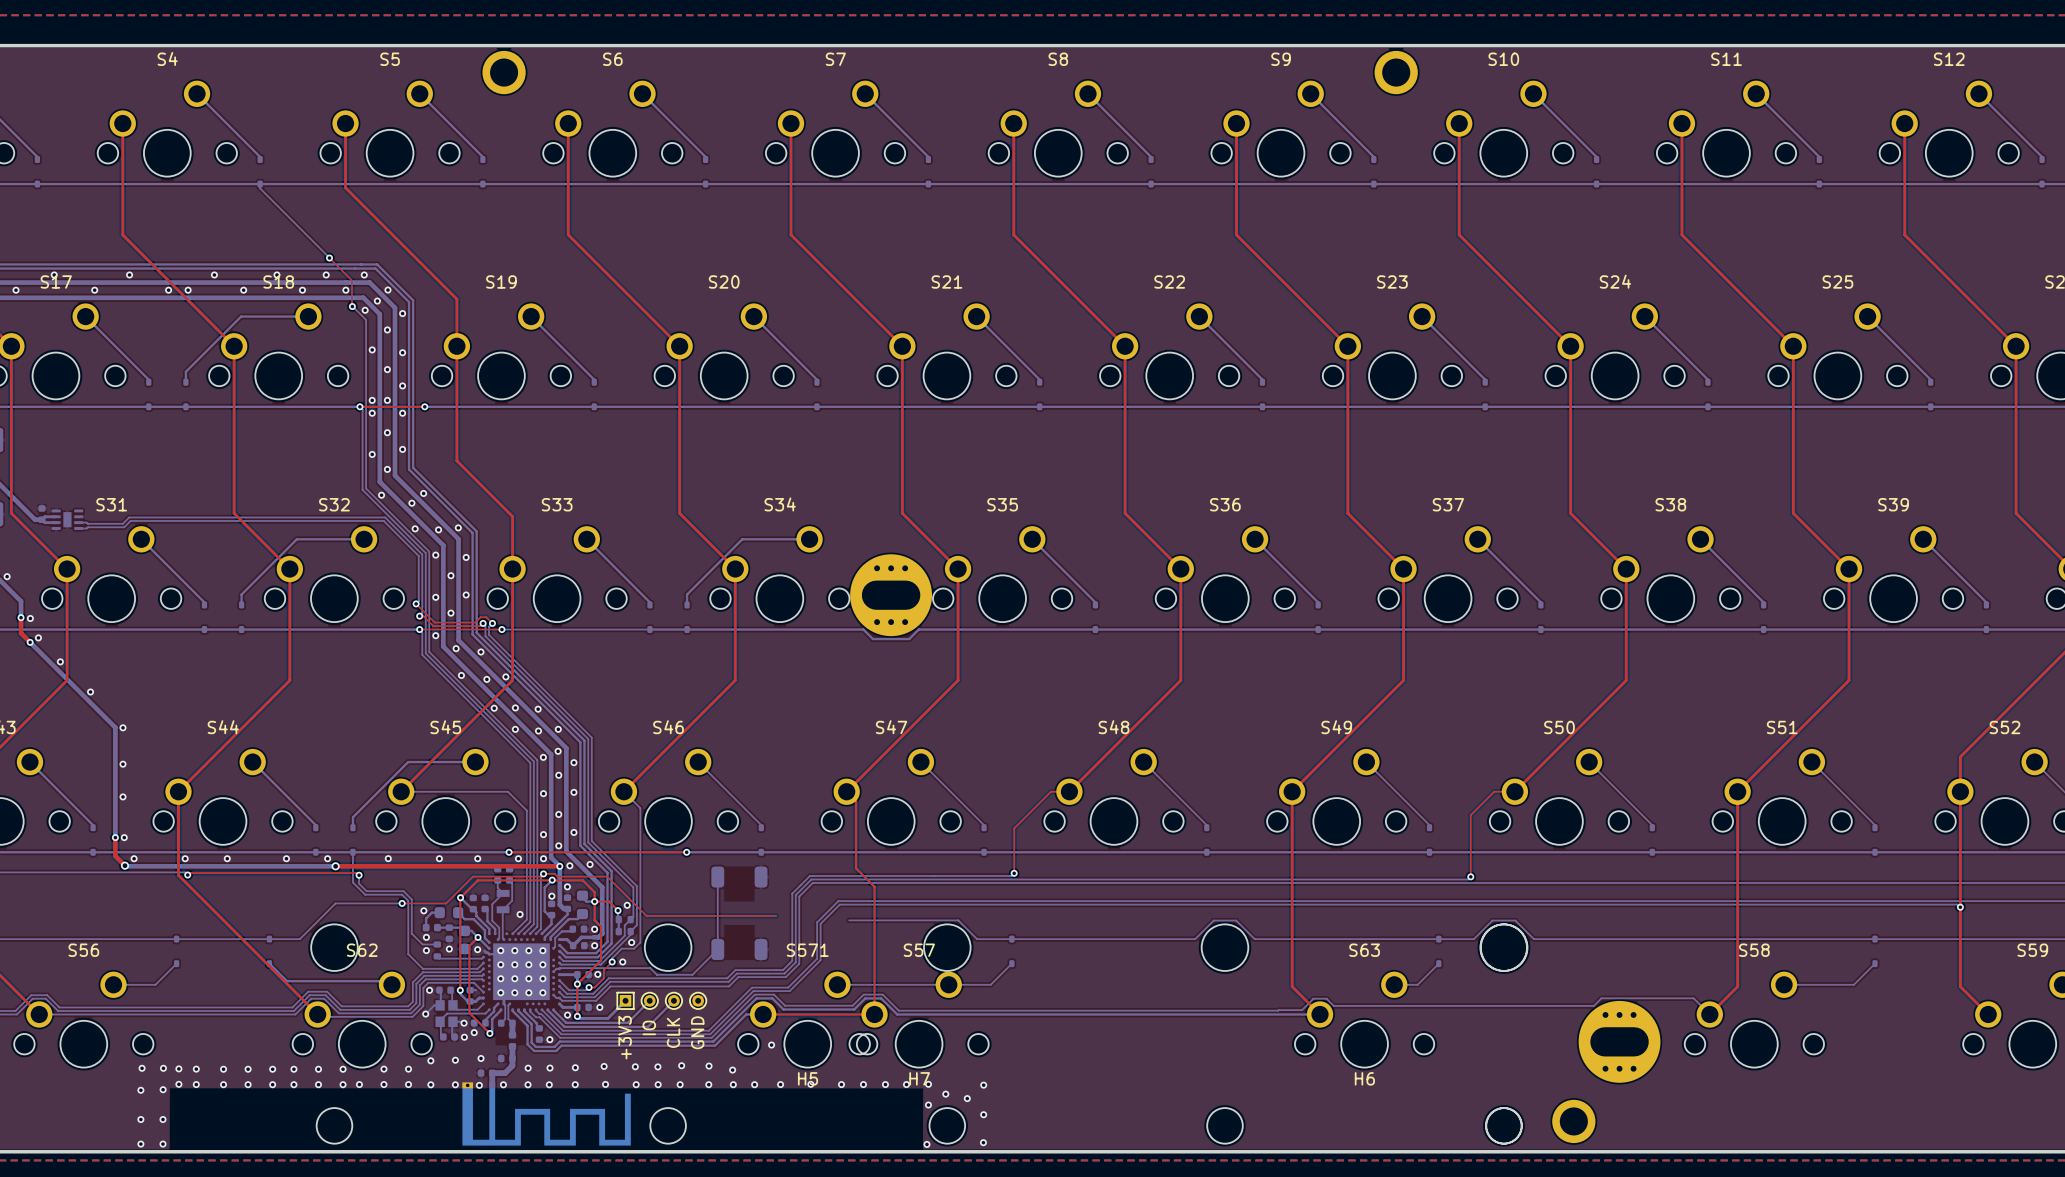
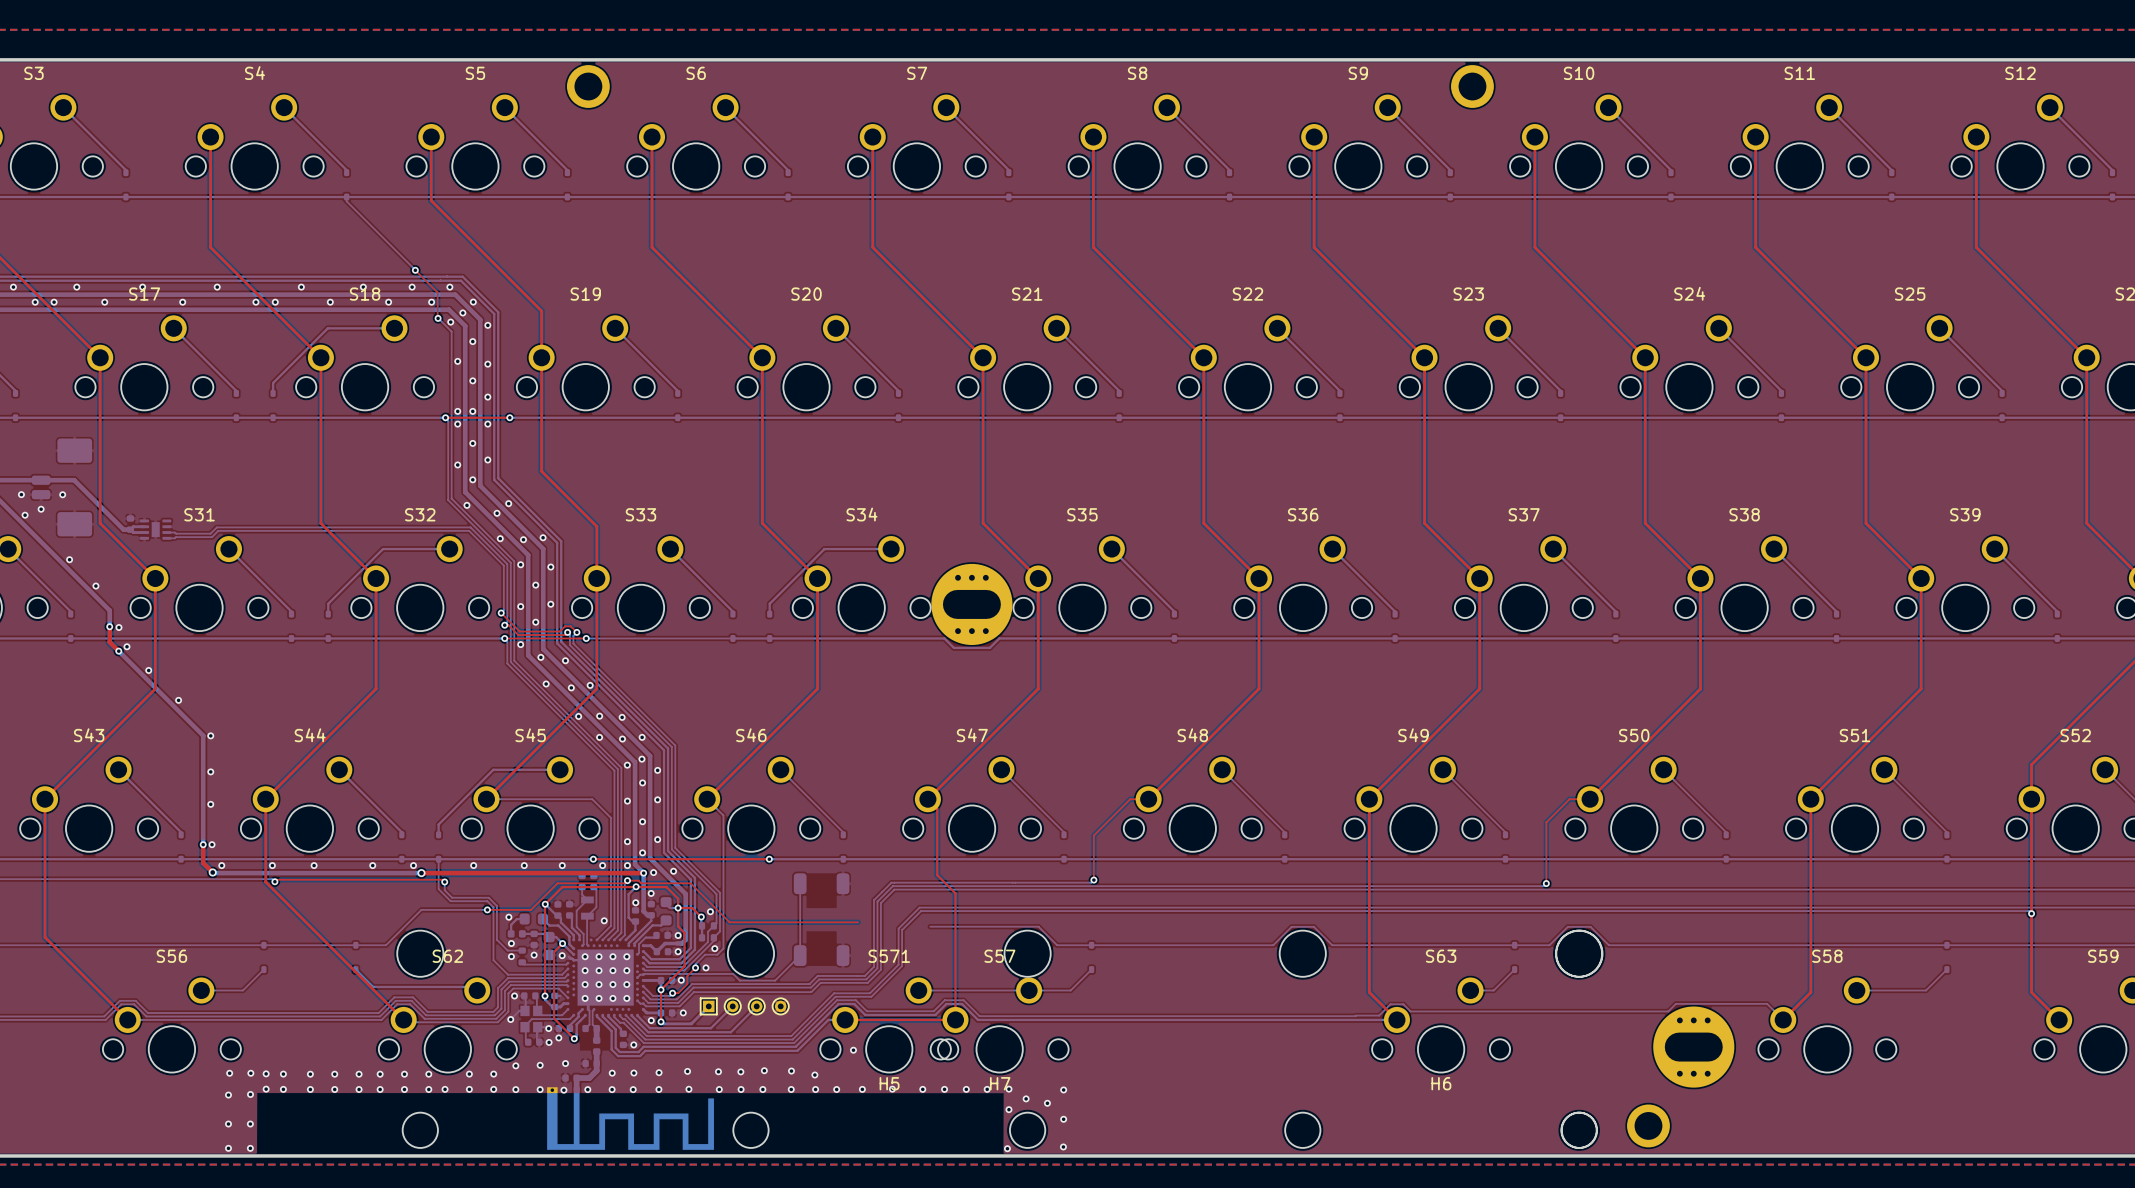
IO name: IO (649, 1027) -> none
CLK name: CLK (673, 1032) -> none
GND name: GND (697, 1032) -> none
+3V3 name: +3V3 (625, 1037) -> none

